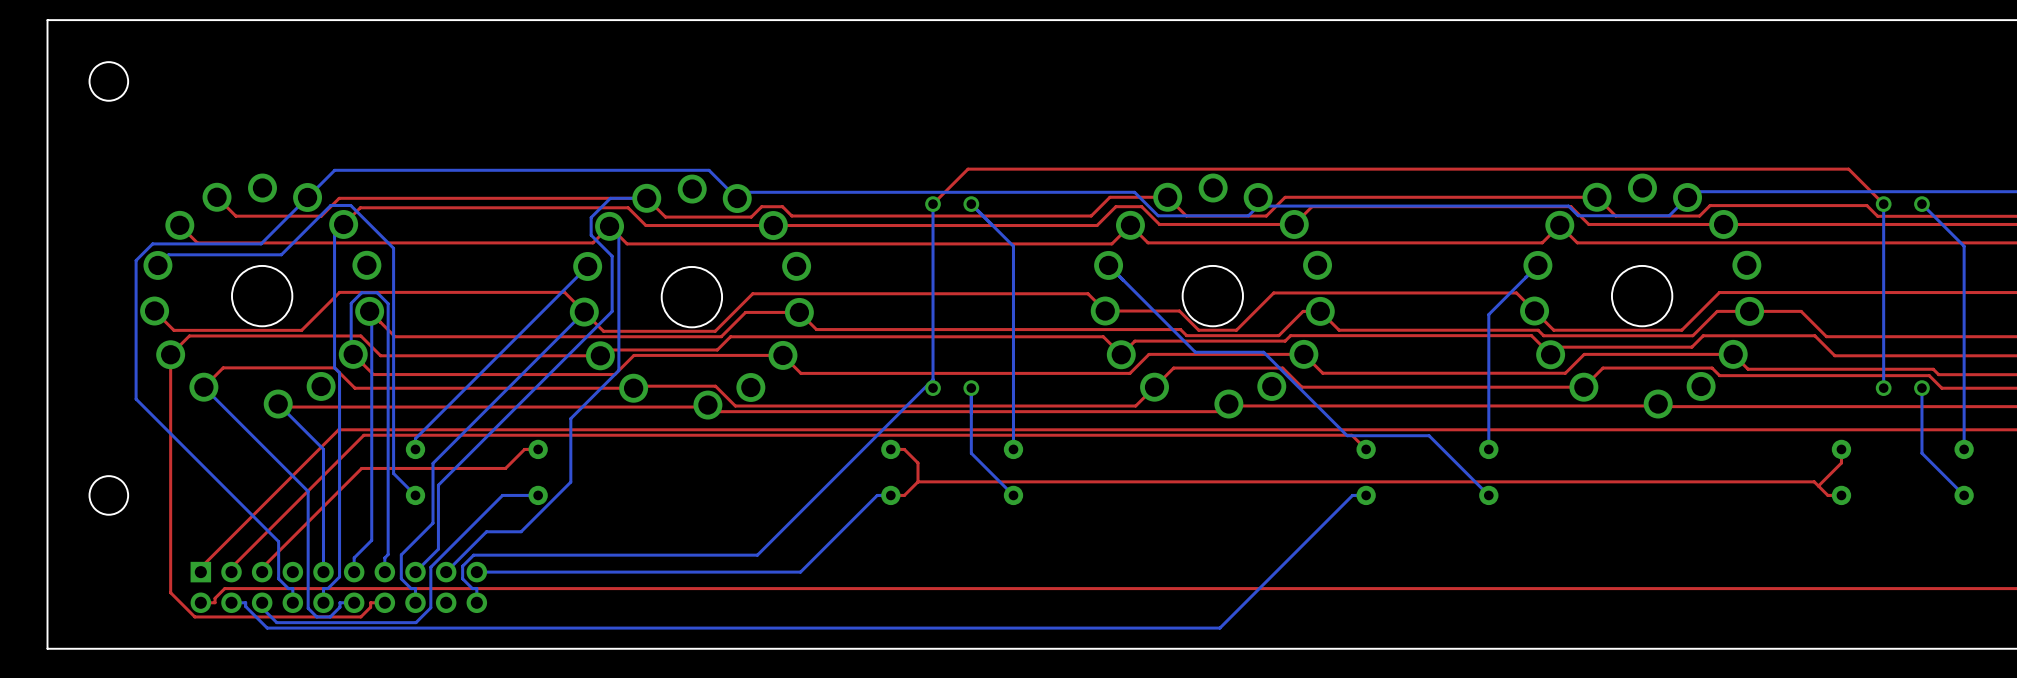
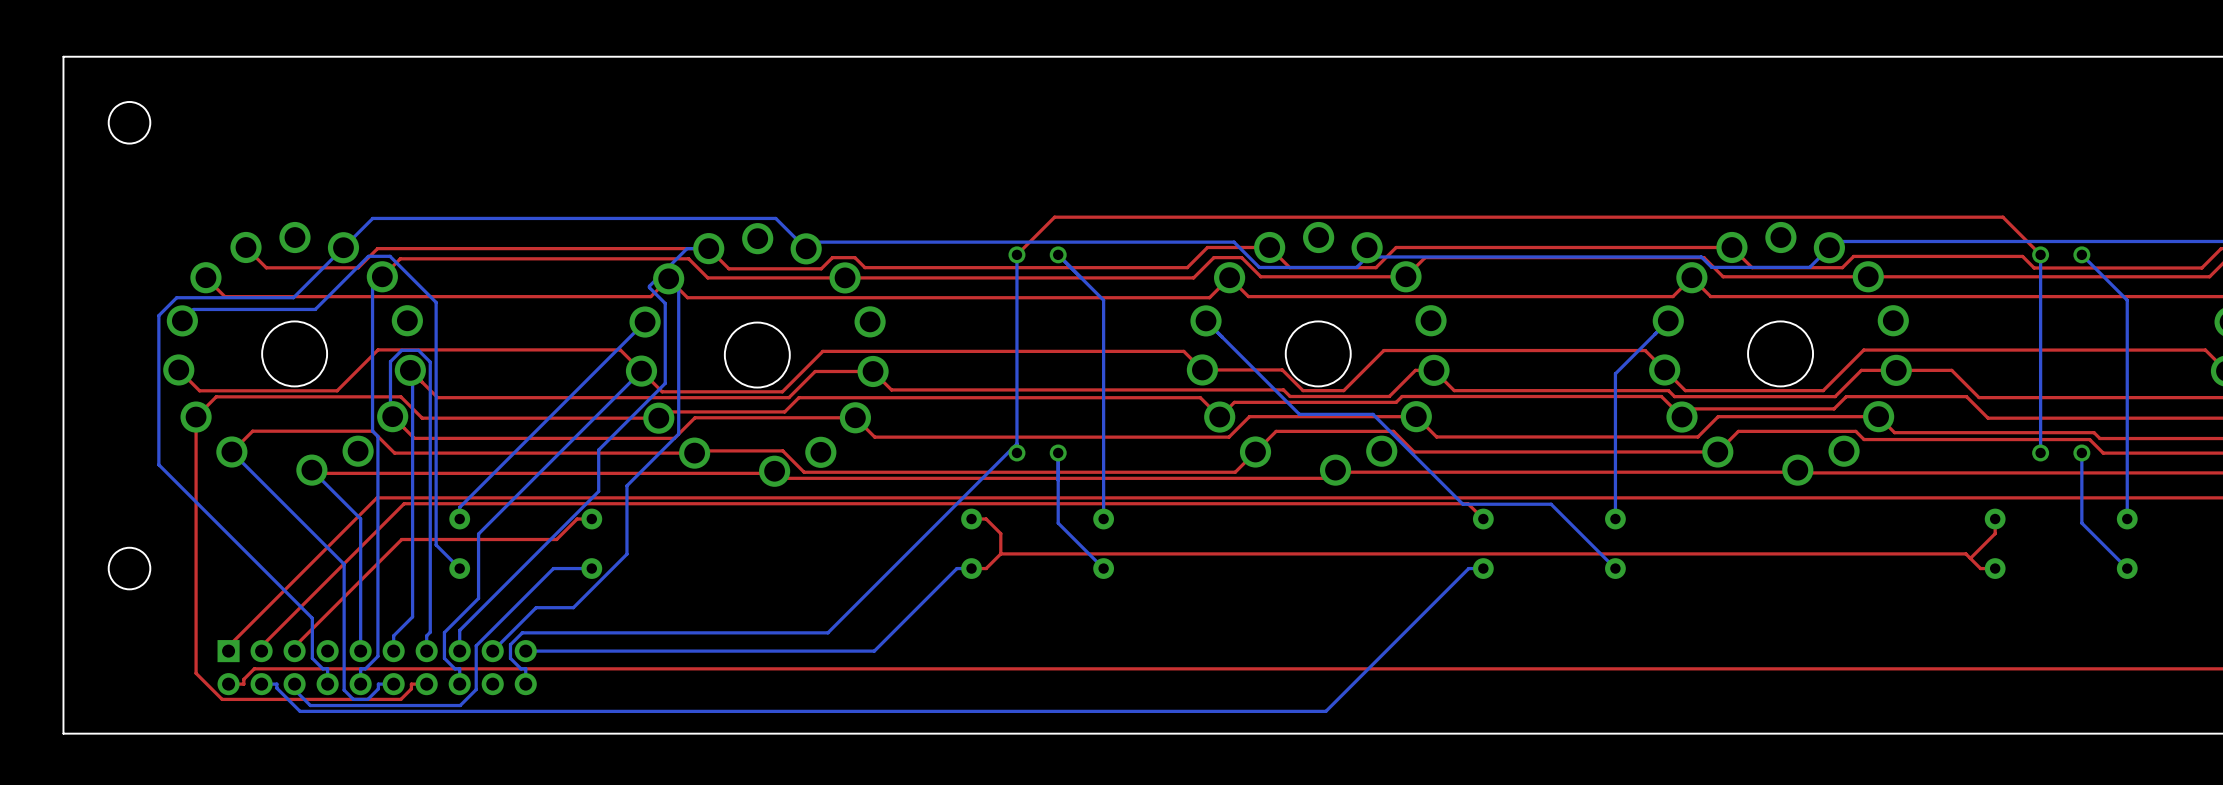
bottom track: (626, 198) (610, 198) (591, 217) (591, 235) (612, 256) (612, 311) (438, 485) (438, 549) (415, 572) -> (687, 248) (649, 286) (665, 303) (665, 383) (598, 449) (598, 491) (459, 630) (459, 651)

